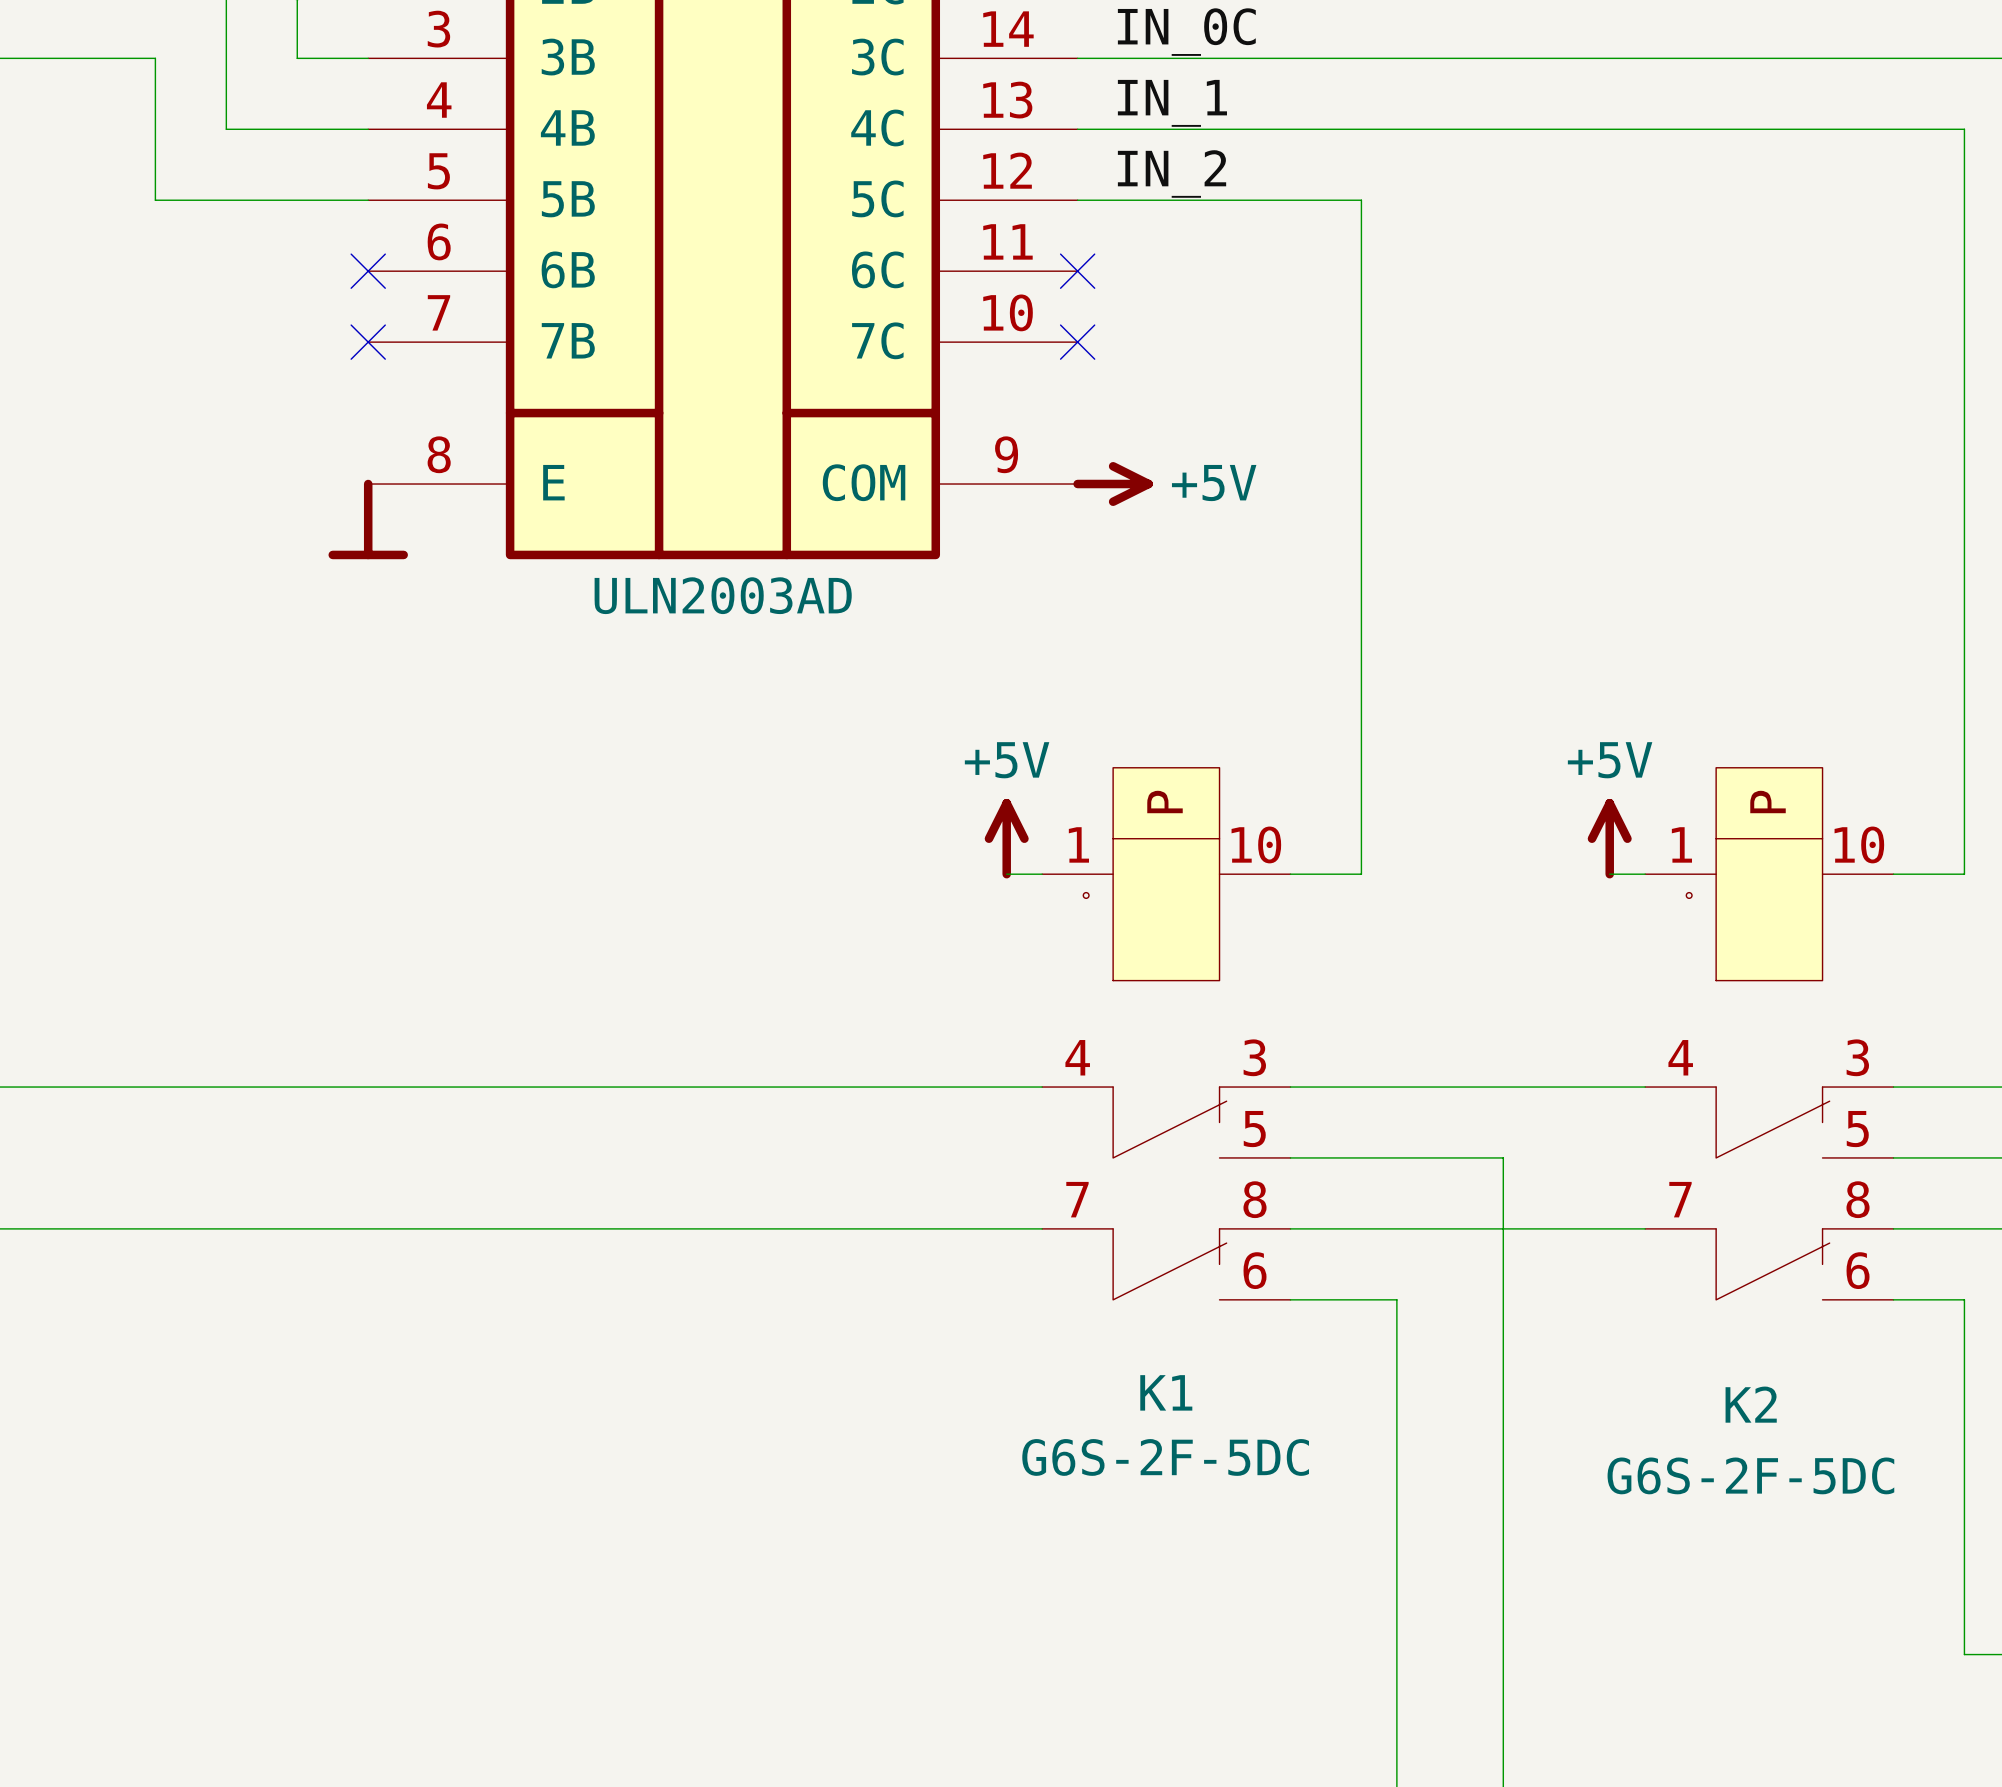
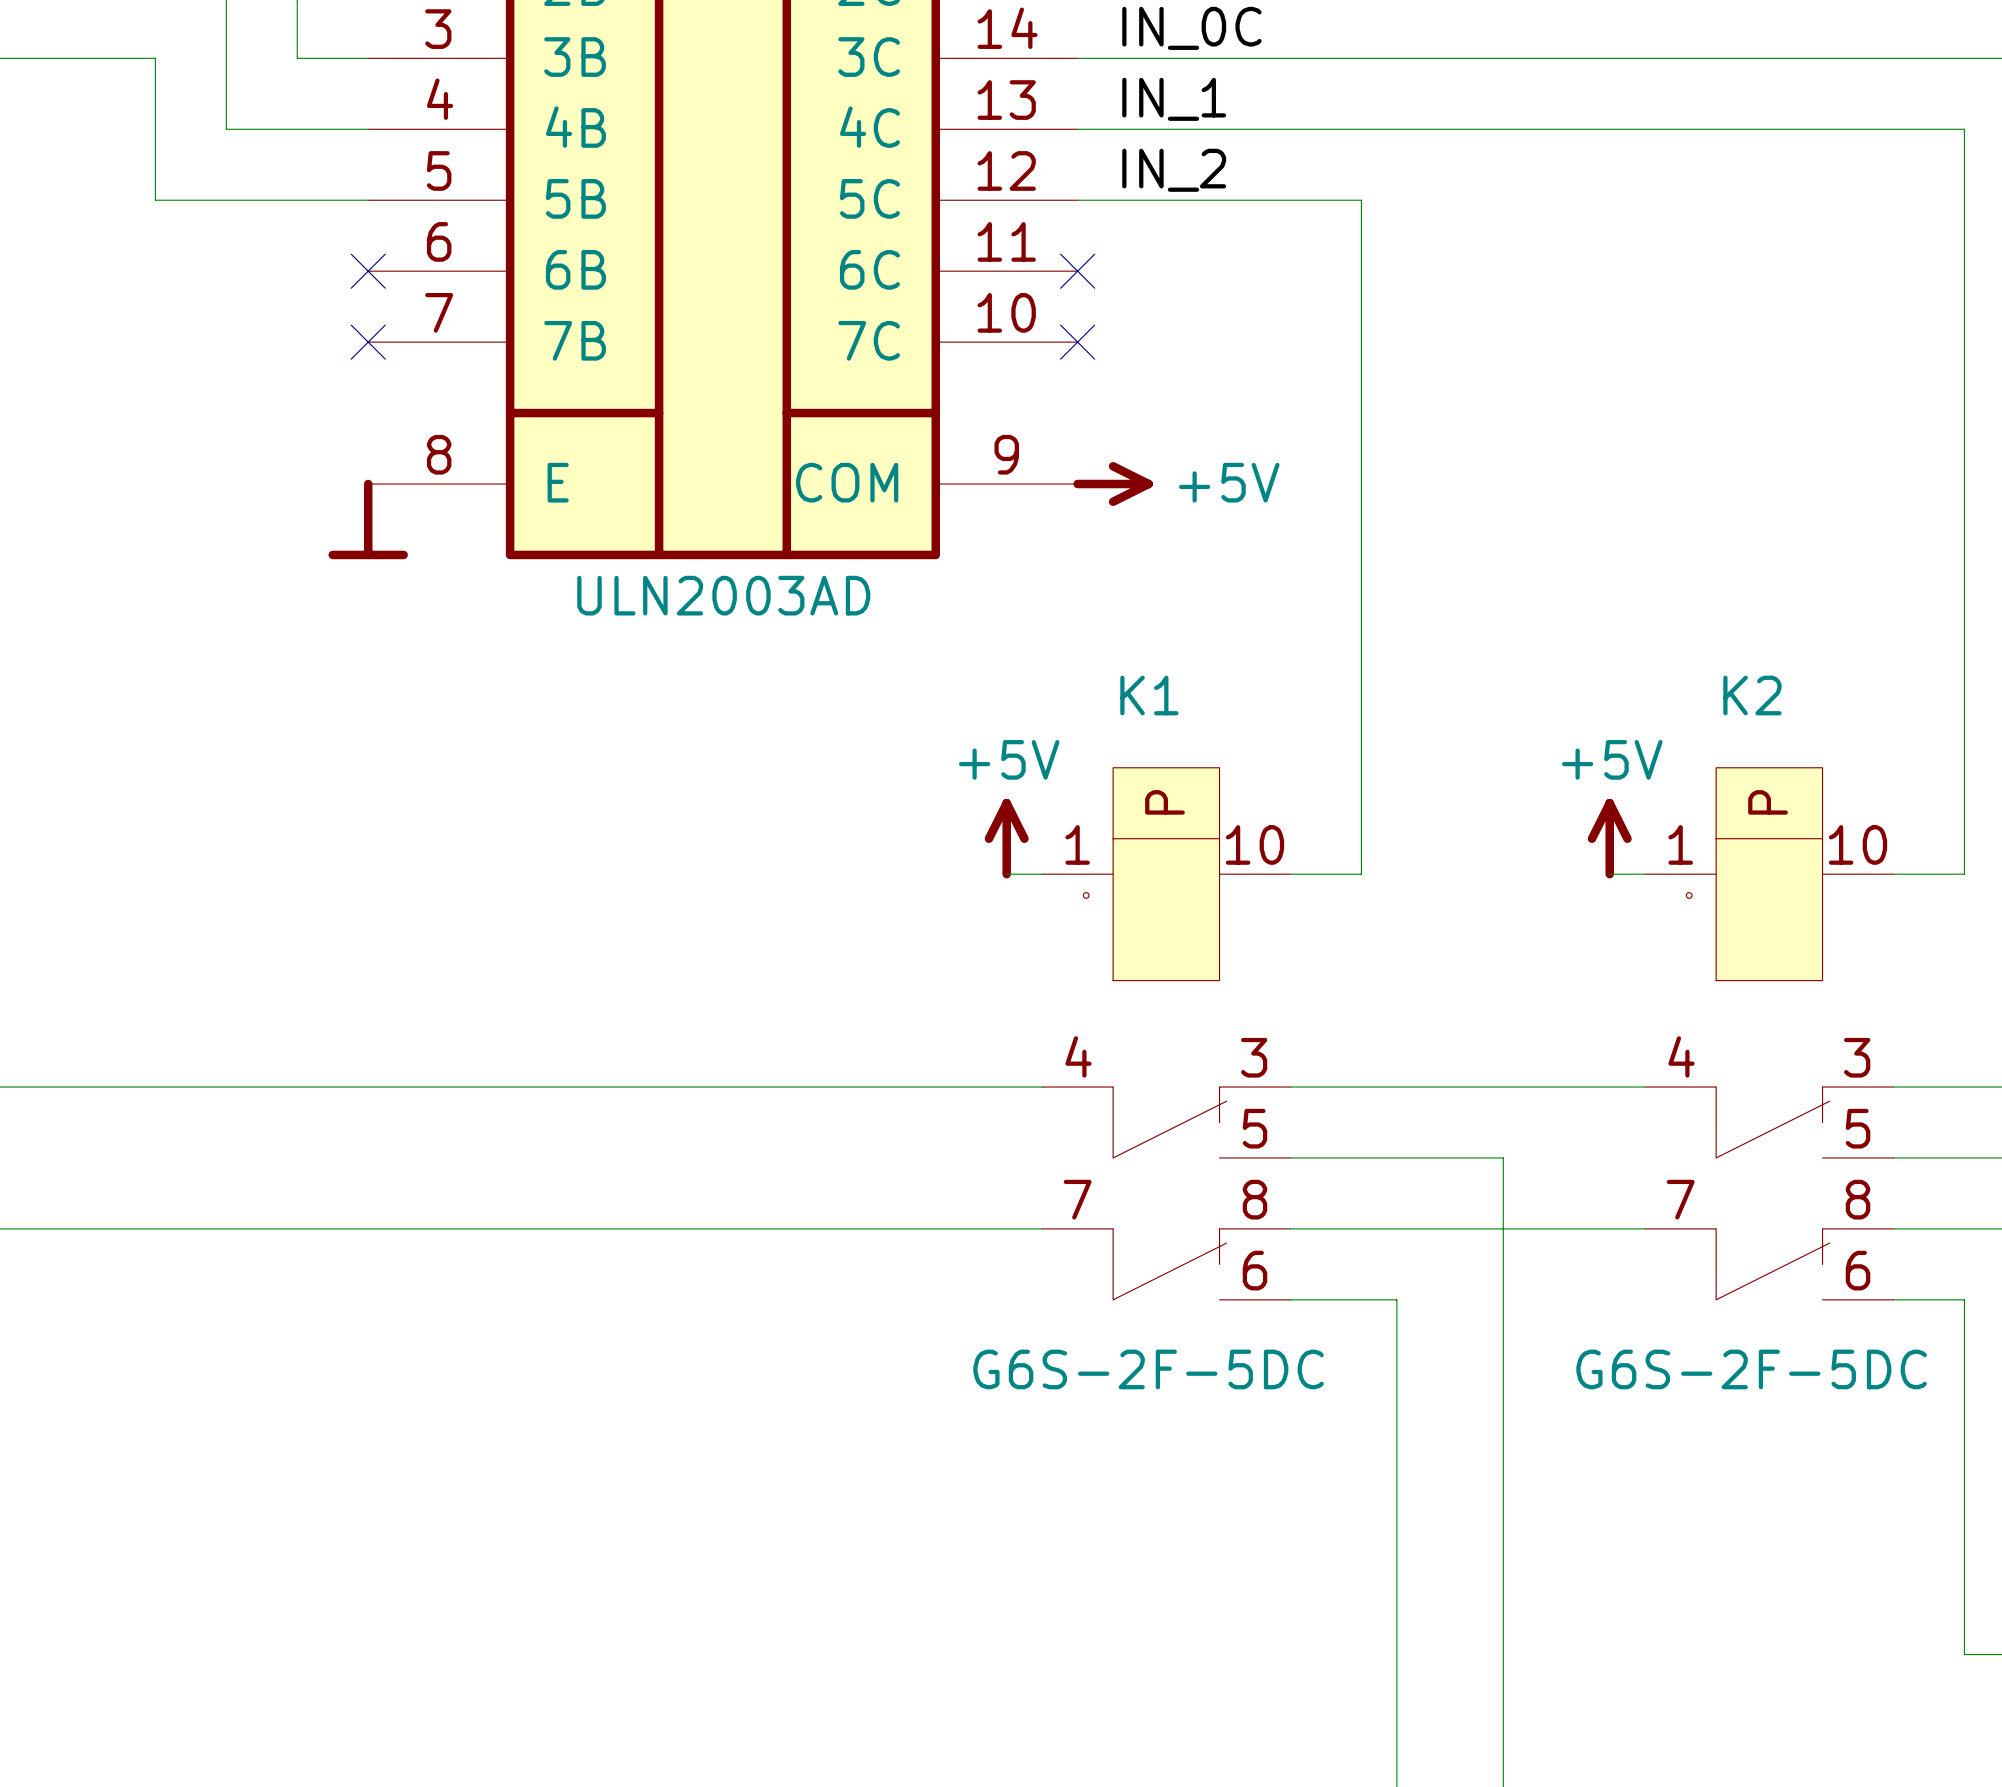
K1 name position: K1 (1166, 1392) -> K1 (1149, 695)
K2 name position: K2 (1751, 1404) -> K2 (1752, 695)
K1 value position: G6S-2F-5DC (1165, 1457) -> G6S-2F-5DC (1148, 1369)
K2 value position: G6S-2F-5DC (1750, 1475) -> G6S-2F-5DC (1751, 1369)

